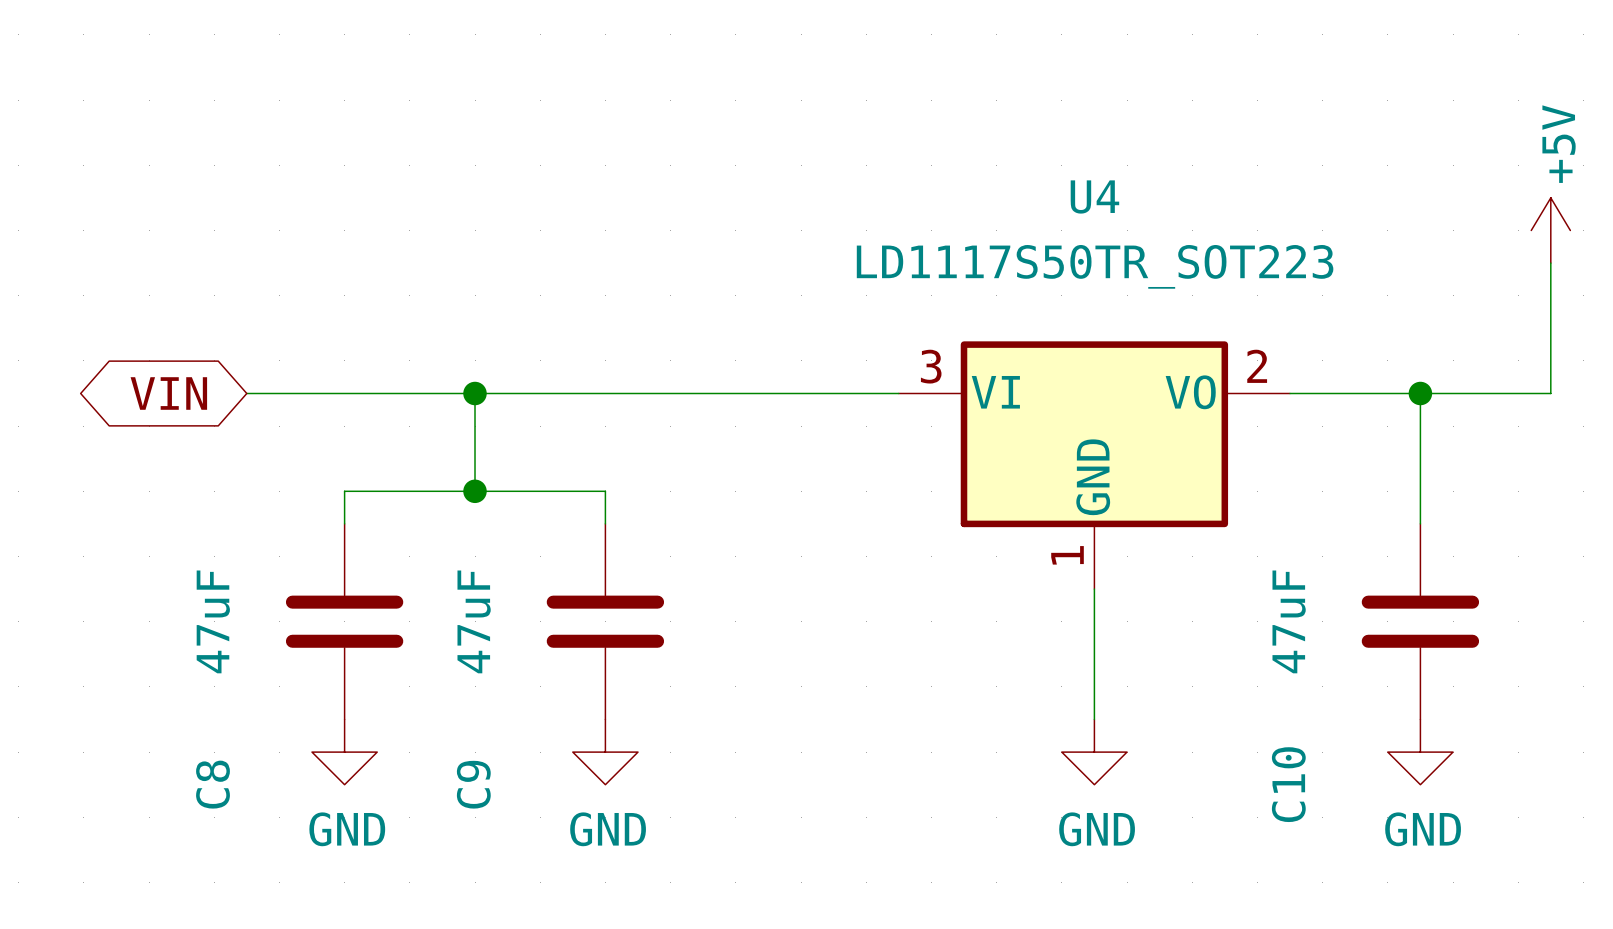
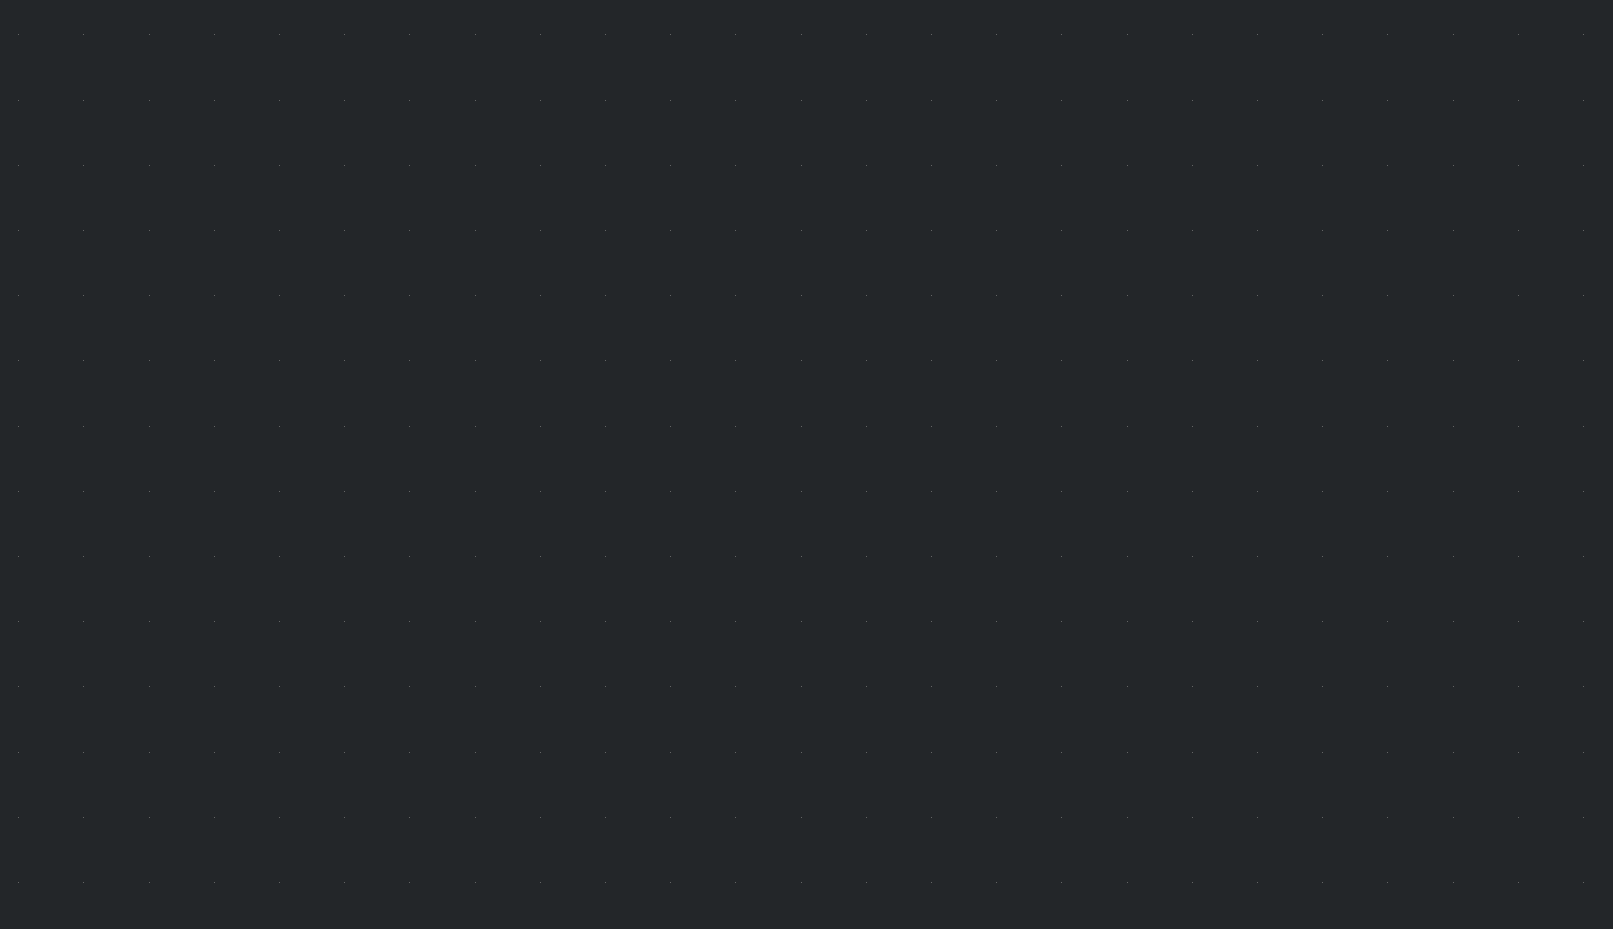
power symbol: +5V (1550, 230) -> none
wire: (1550, 263) (1550, 393) (1290, 393) -> none
global label: VIN (168, 393) -> none
wire: (246, 393) (898, 393) -> none
wire: (475, 393) (475, 491) -> none
junction: (475, 393) -> none
wire: (1420, 393) (1420, 523) -> none
junction: (1420, 393) -> none
U4: LD1117S50TR_SOT223 (1094, 465) -> none
junction: (475, 491) -> none
wire: (344, 523) (344, 491) (605, 491) (605, 523) -> none
wire: (1094, 589) (1094, 719) -> none
C8: 47uF (344, 621) -> none
C9: 47uF (605, 621) -> none
C10: 47uF (1420, 621) -> none
power symbol: GND (344, 752) -> none
power symbol: GND (605, 752) -> none
power symbol: GND (1094, 752) -> none
power symbol: GND (1420, 752) -> none

